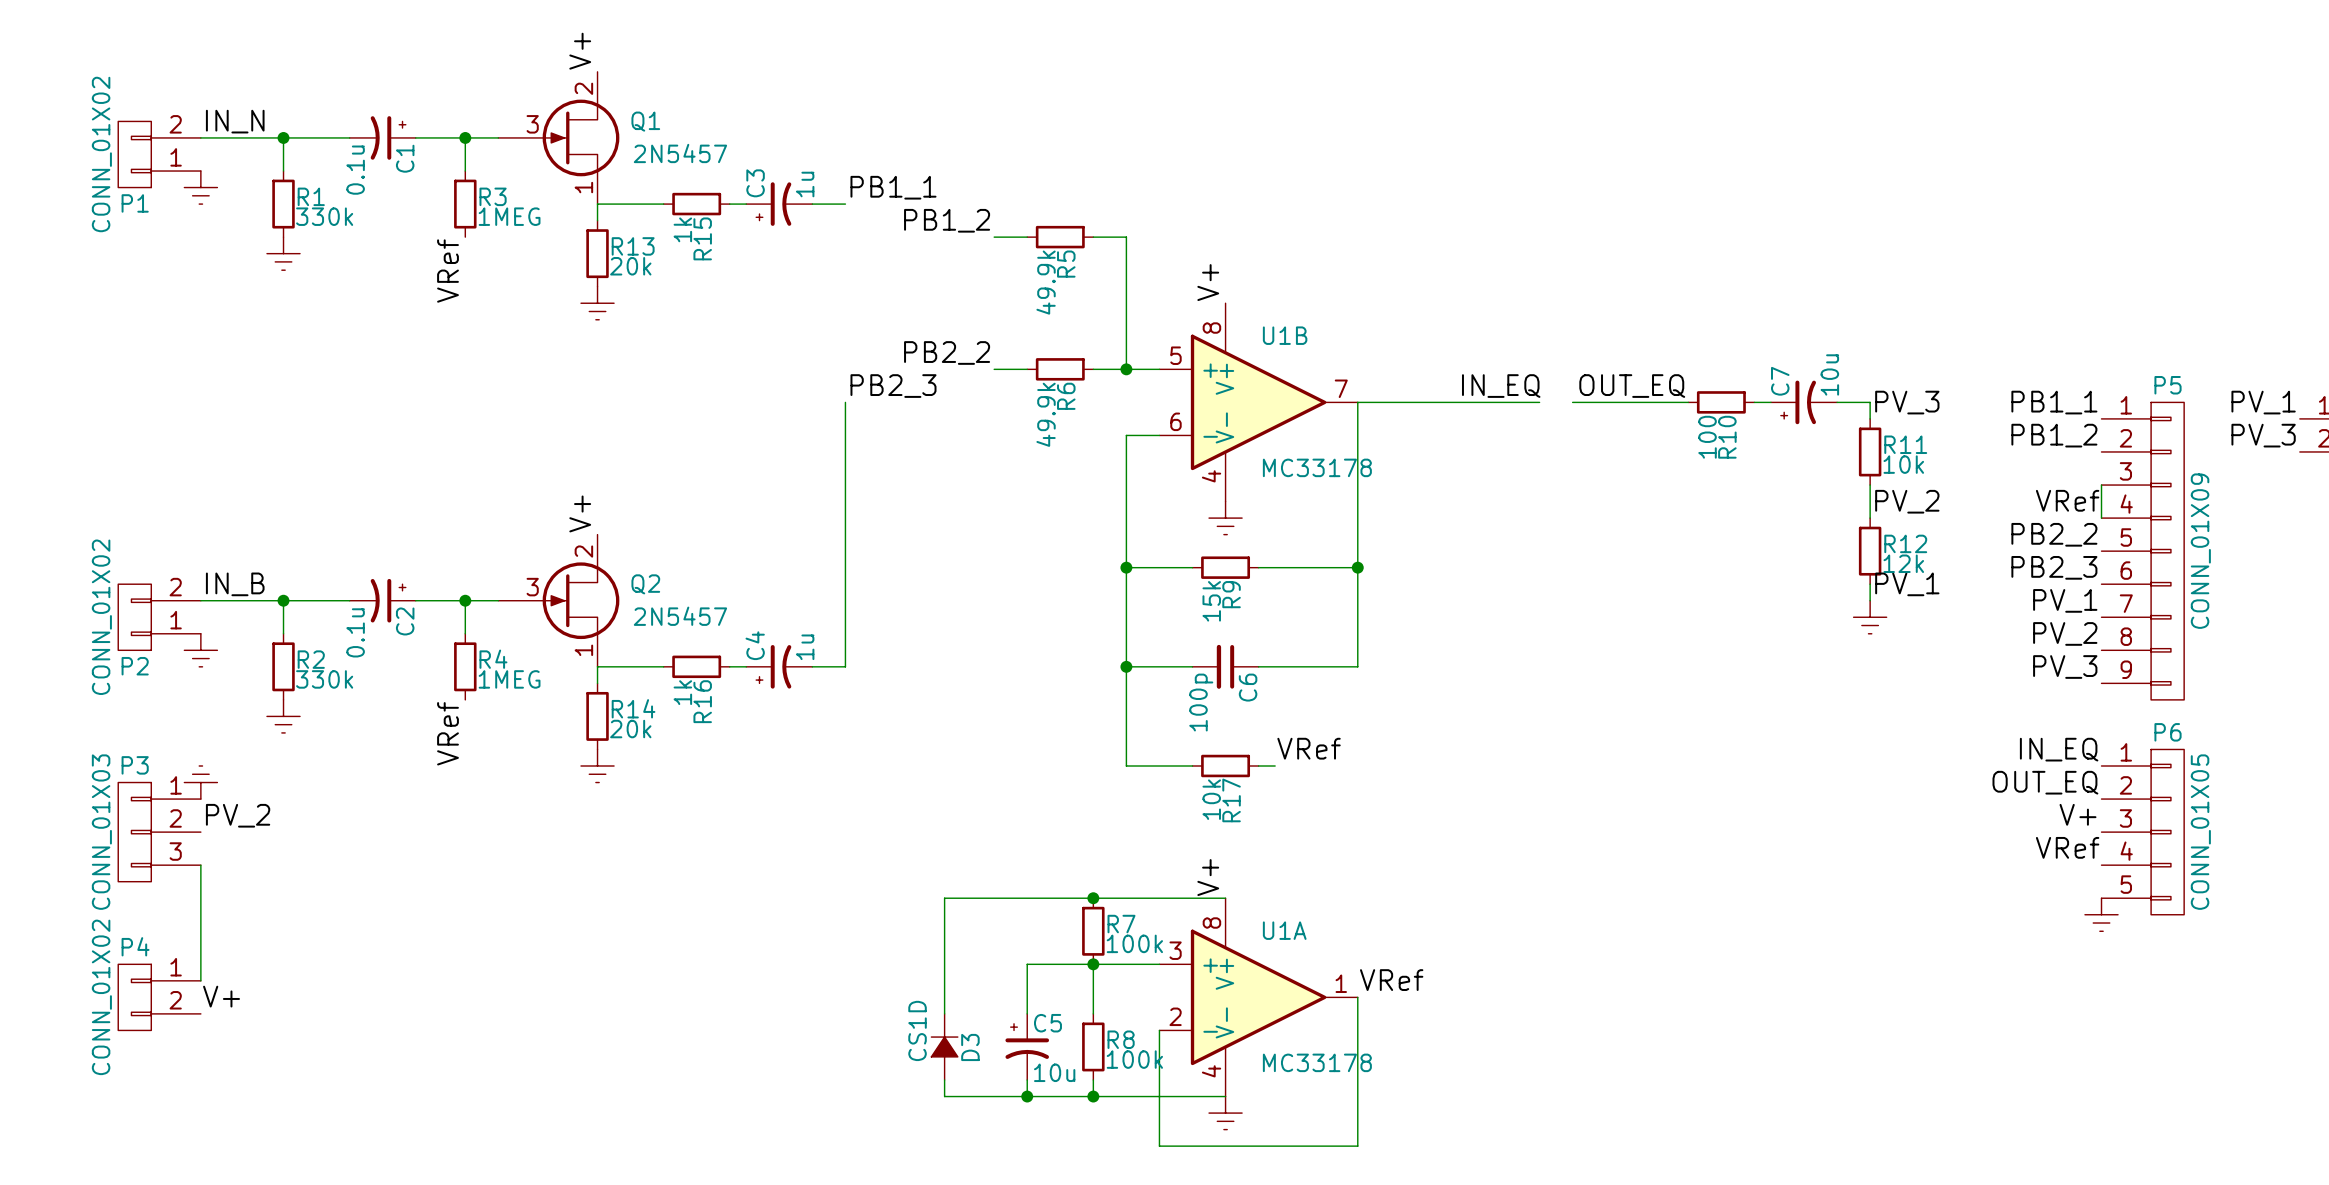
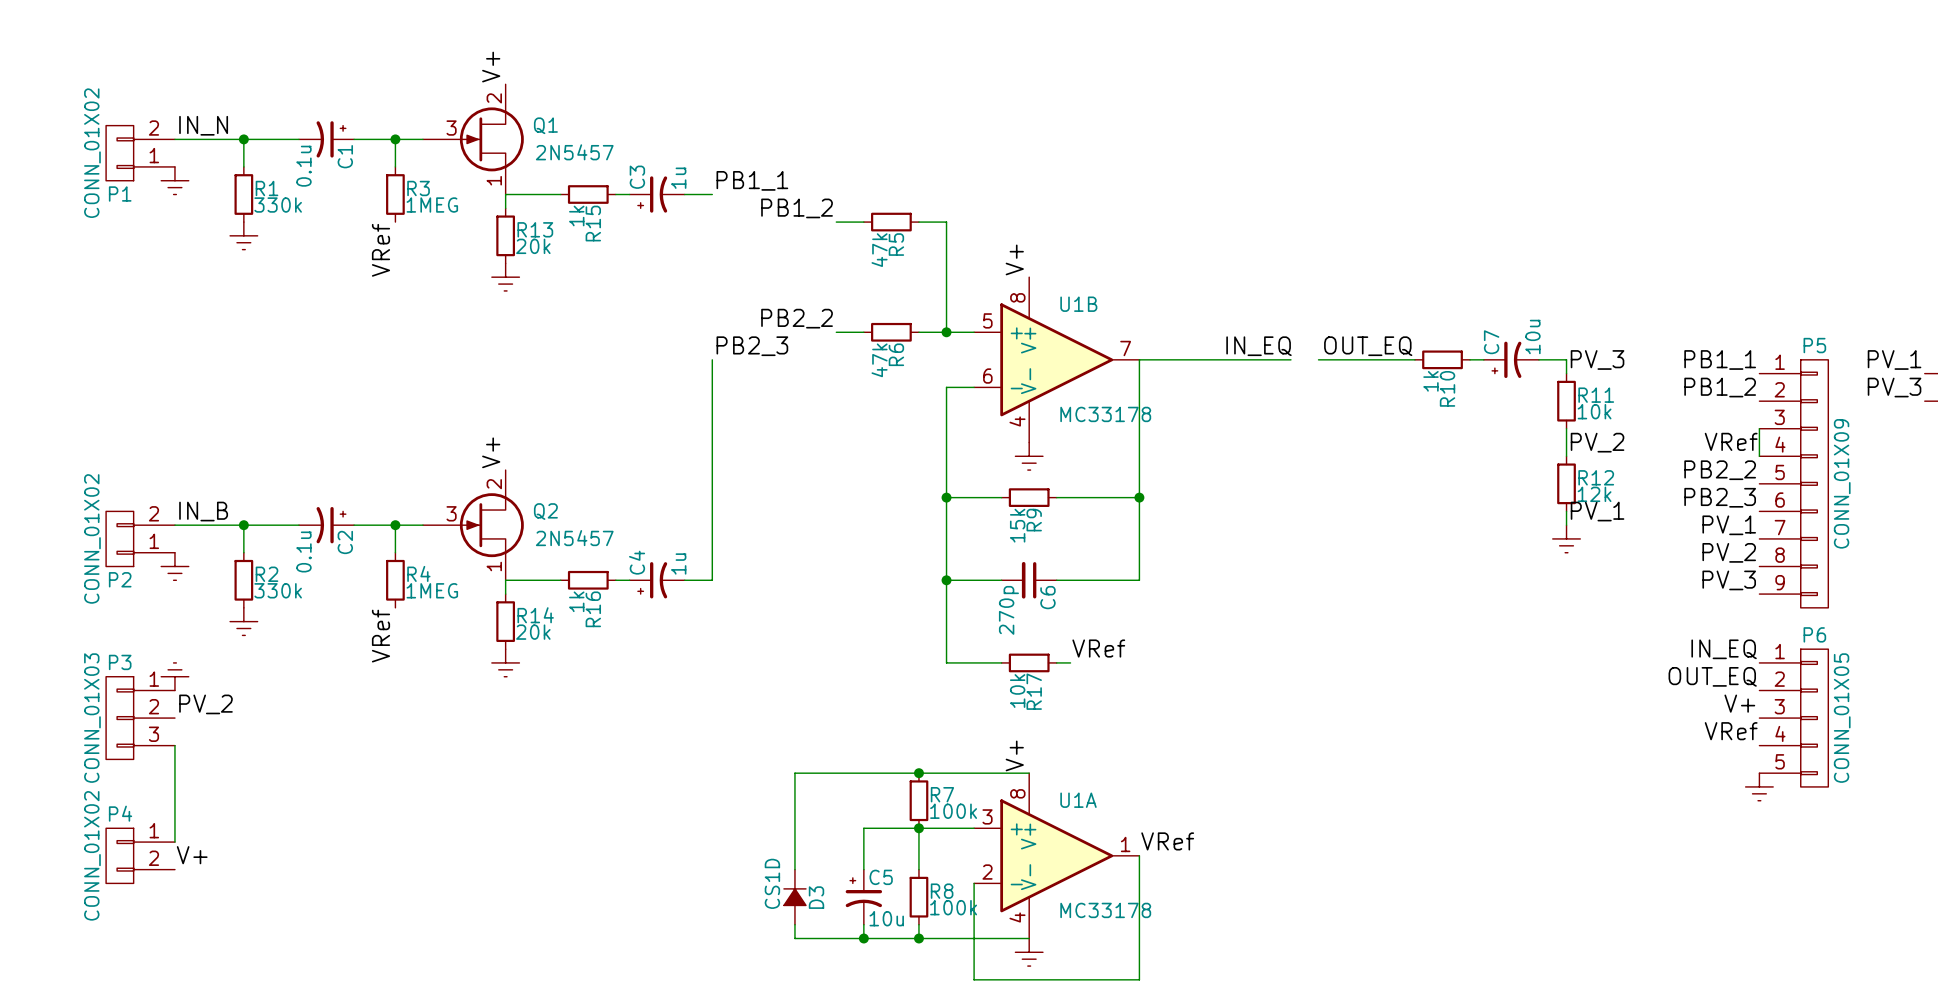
R5 value: 49.9k (1046, 282) -> 47k (879, 250)
R6 value: 49.9k (1046, 414) -> 47k (879, 360)
R10 value: 100 (1707, 437) -> 1k (1430, 381)
C6 value: 100p (1201, 702) -> 270p (1008, 610)

